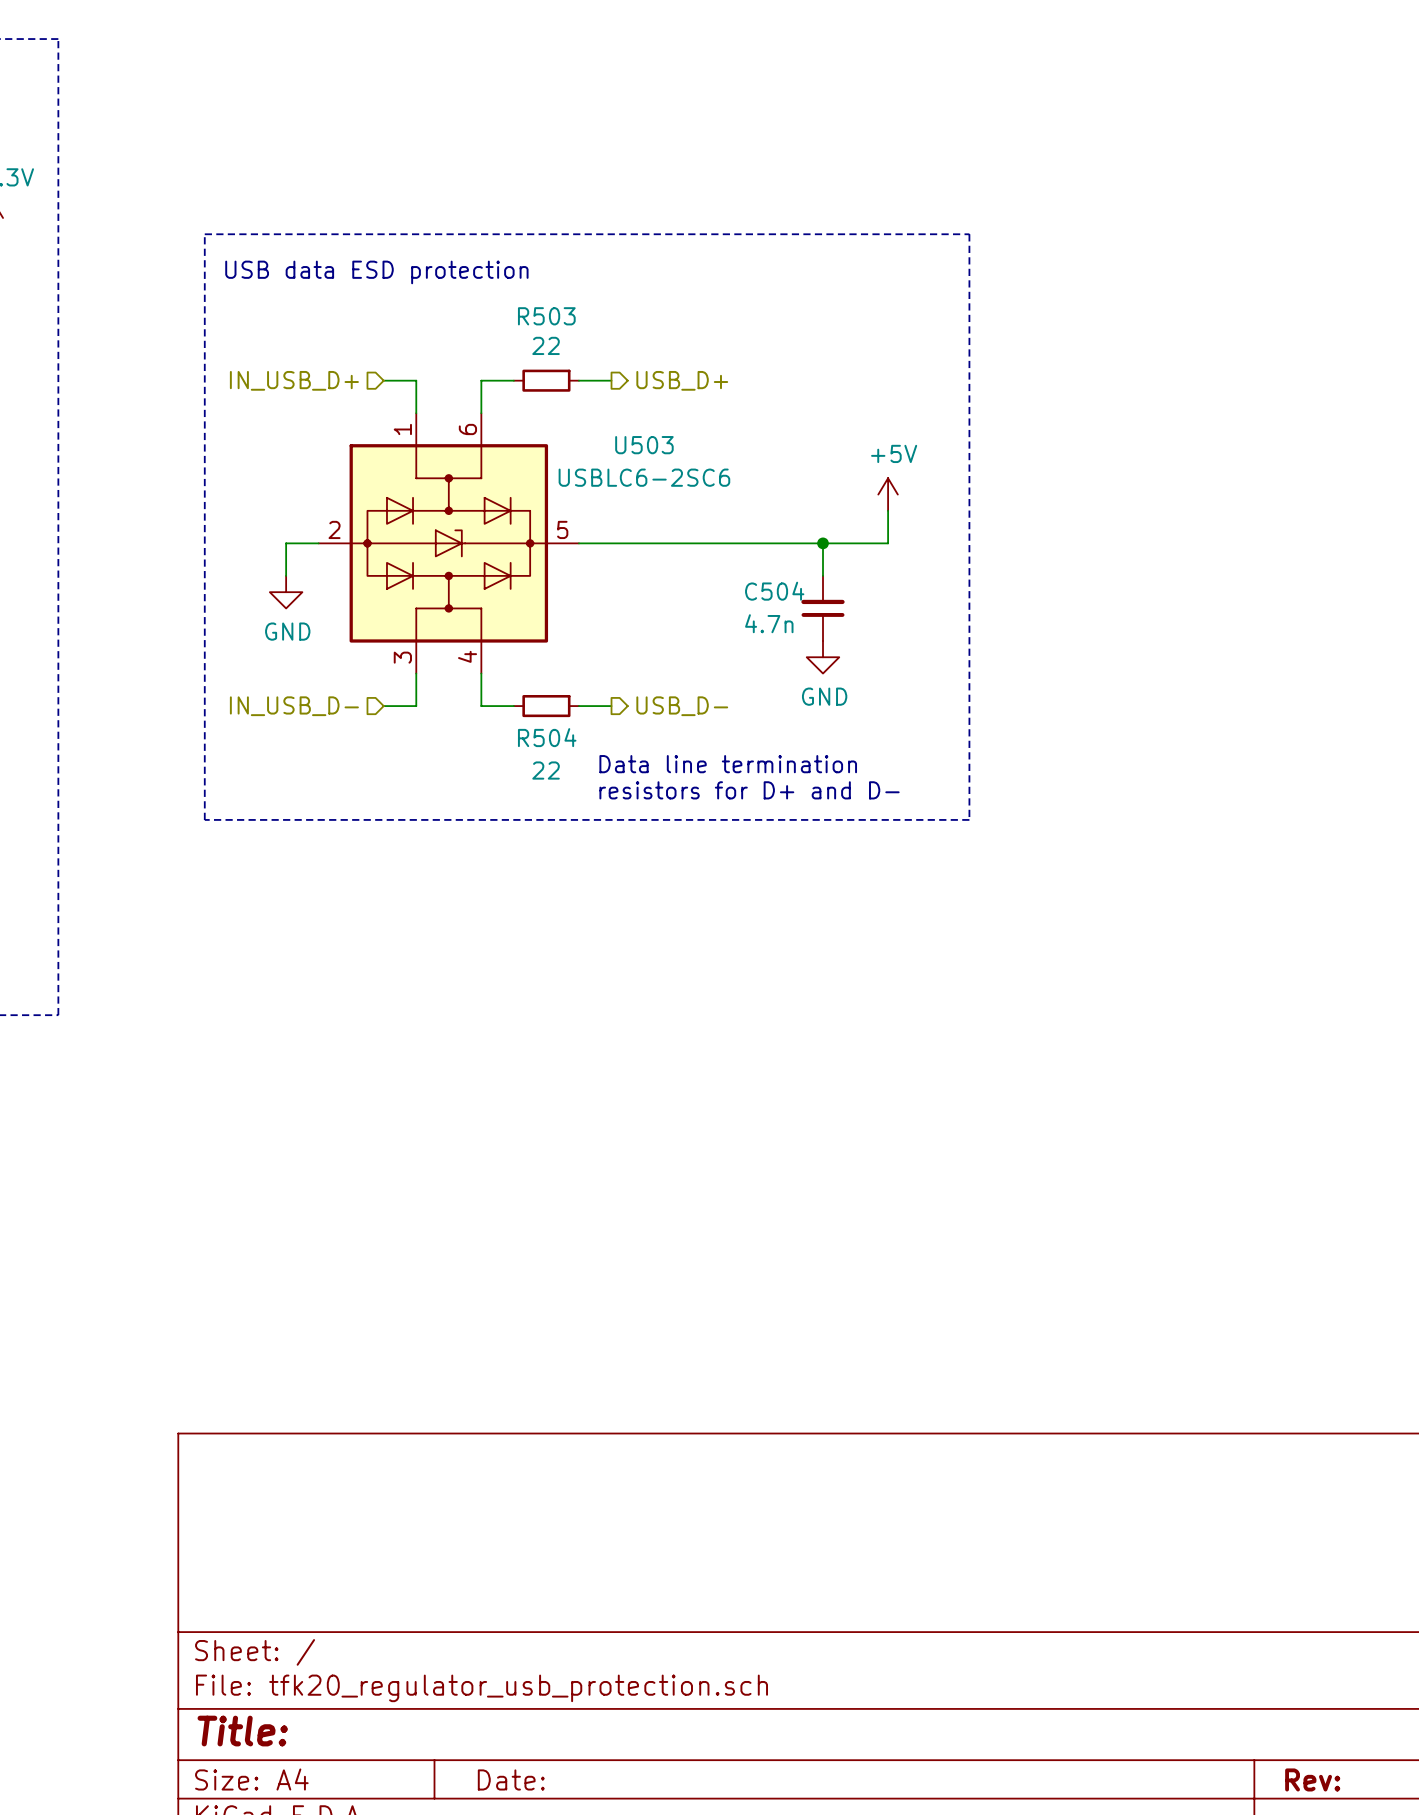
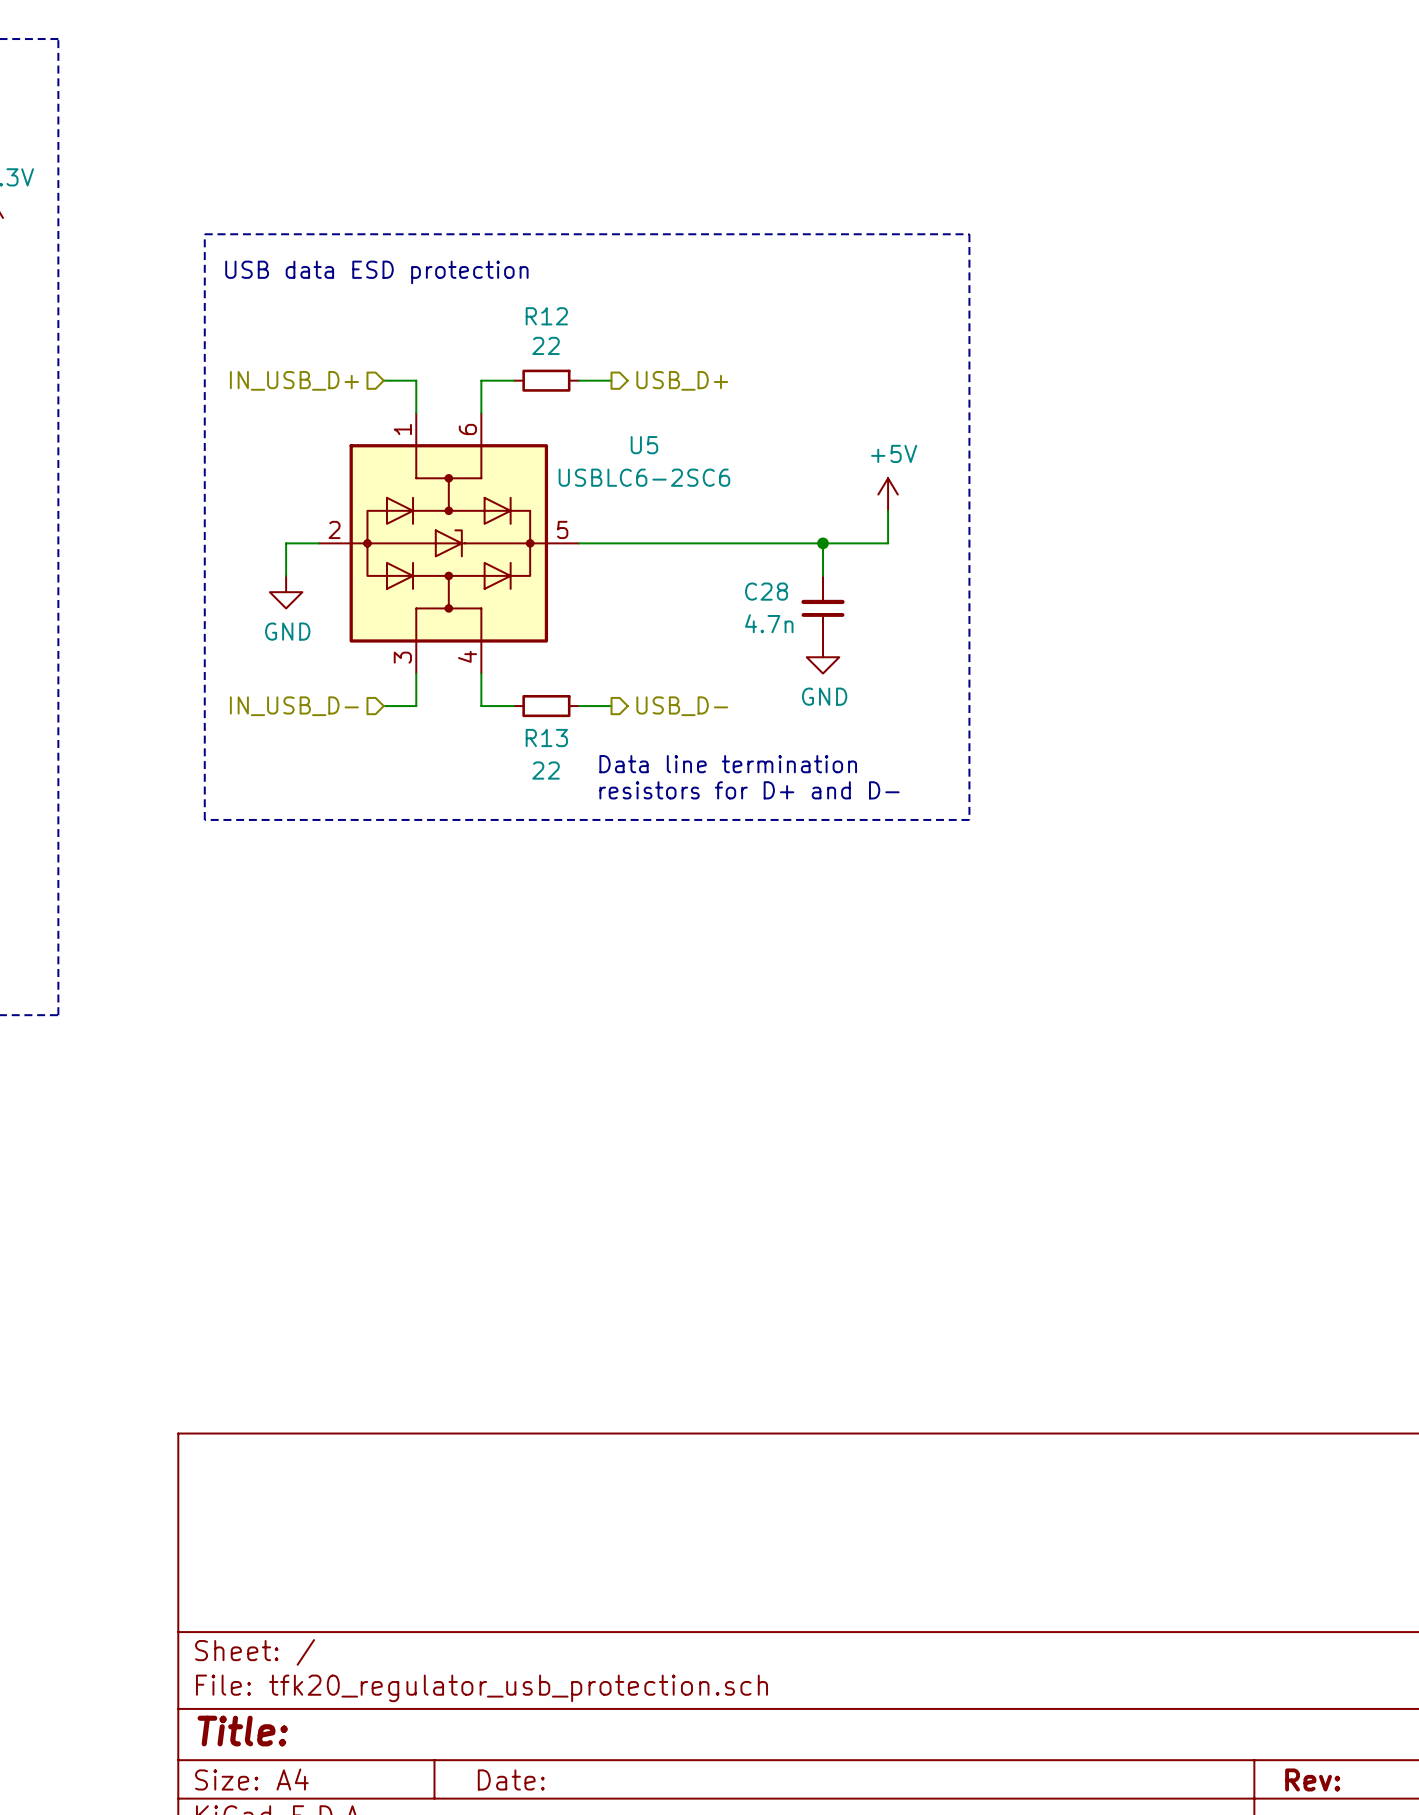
R503 name: R503 (546, 316) -> R12 (546, 316)
U503 name: U503 (644, 445) -> U5 (644, 445)
C504 name: C504 (774, 591) -> C28 (766, 591)
R504 name: R504 (547, 737) -> R13 (546, 737)

